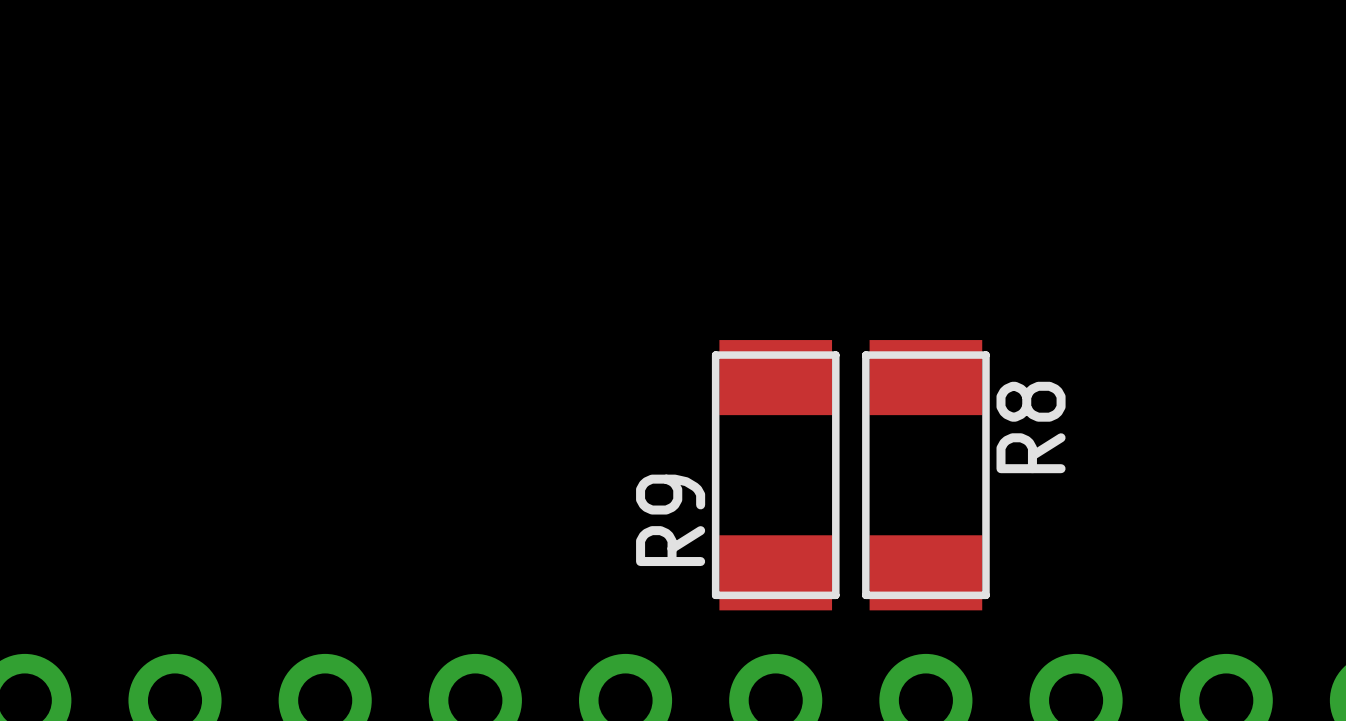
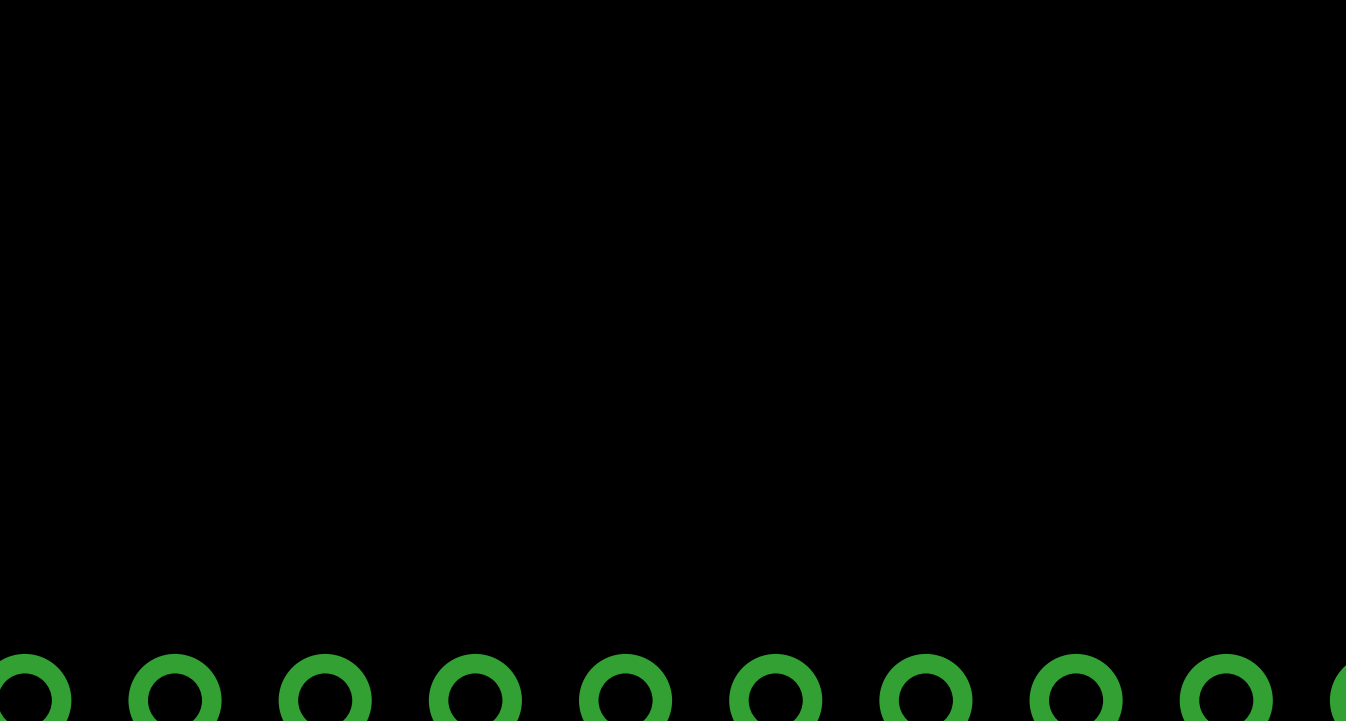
R9: (775, 475) -> none
R8: (925, 475) -> none

